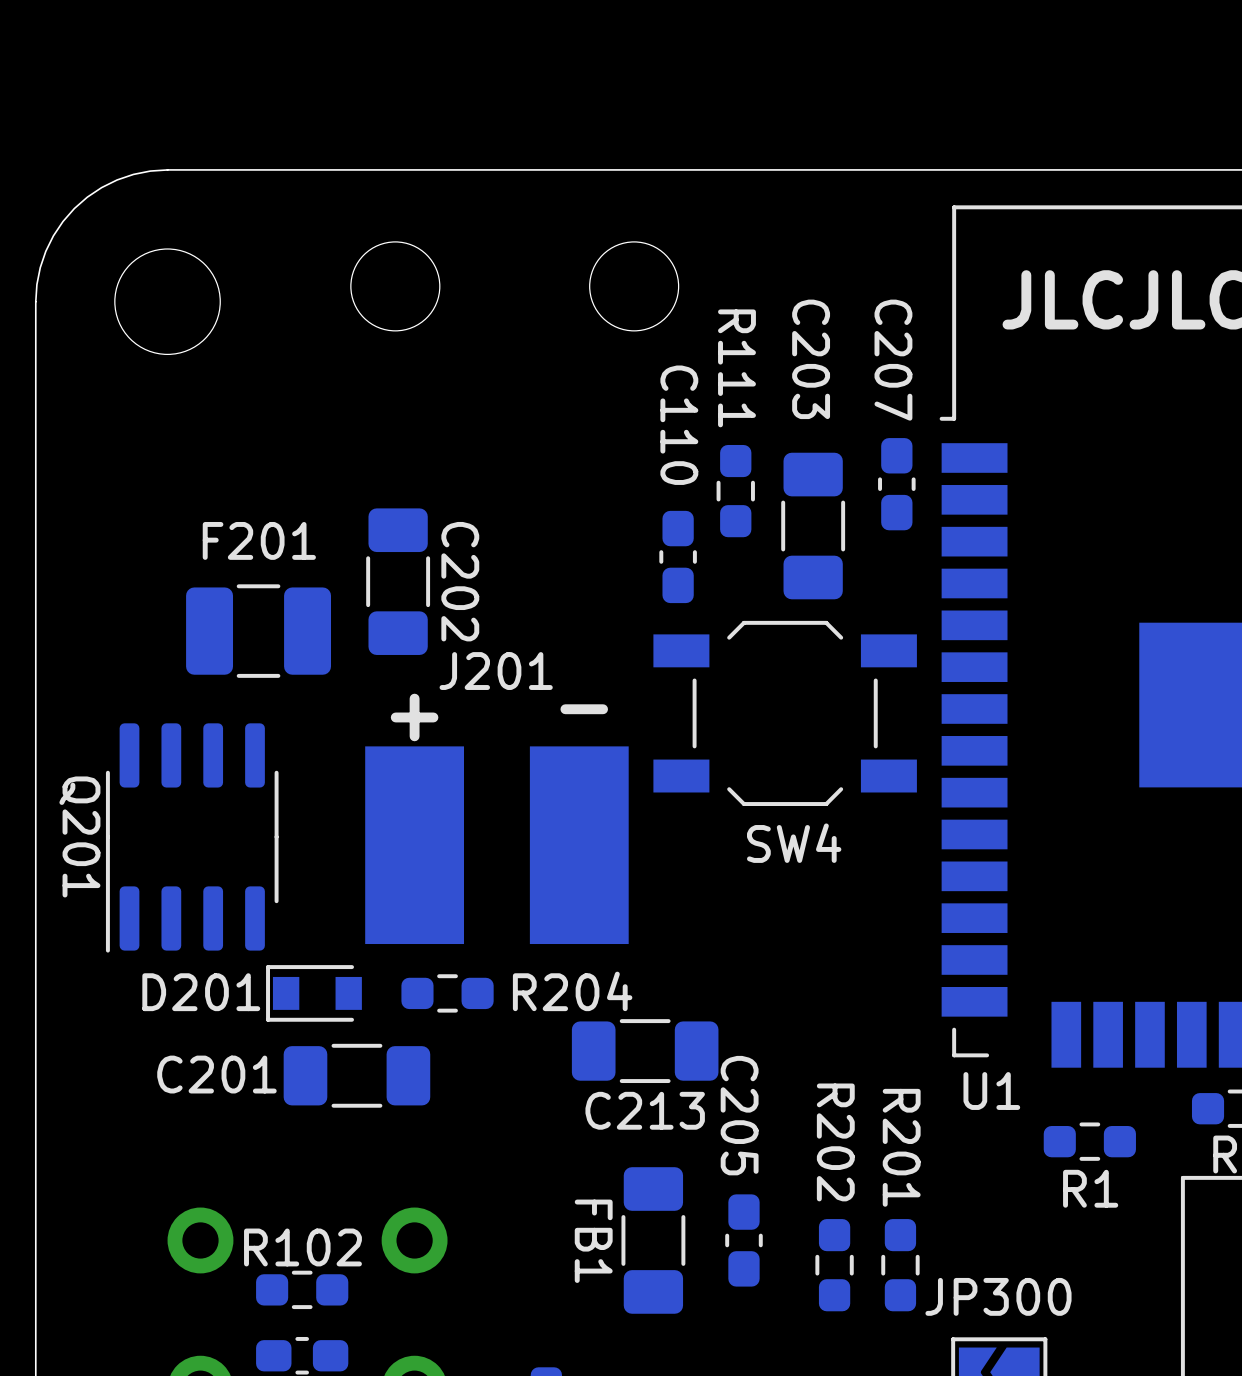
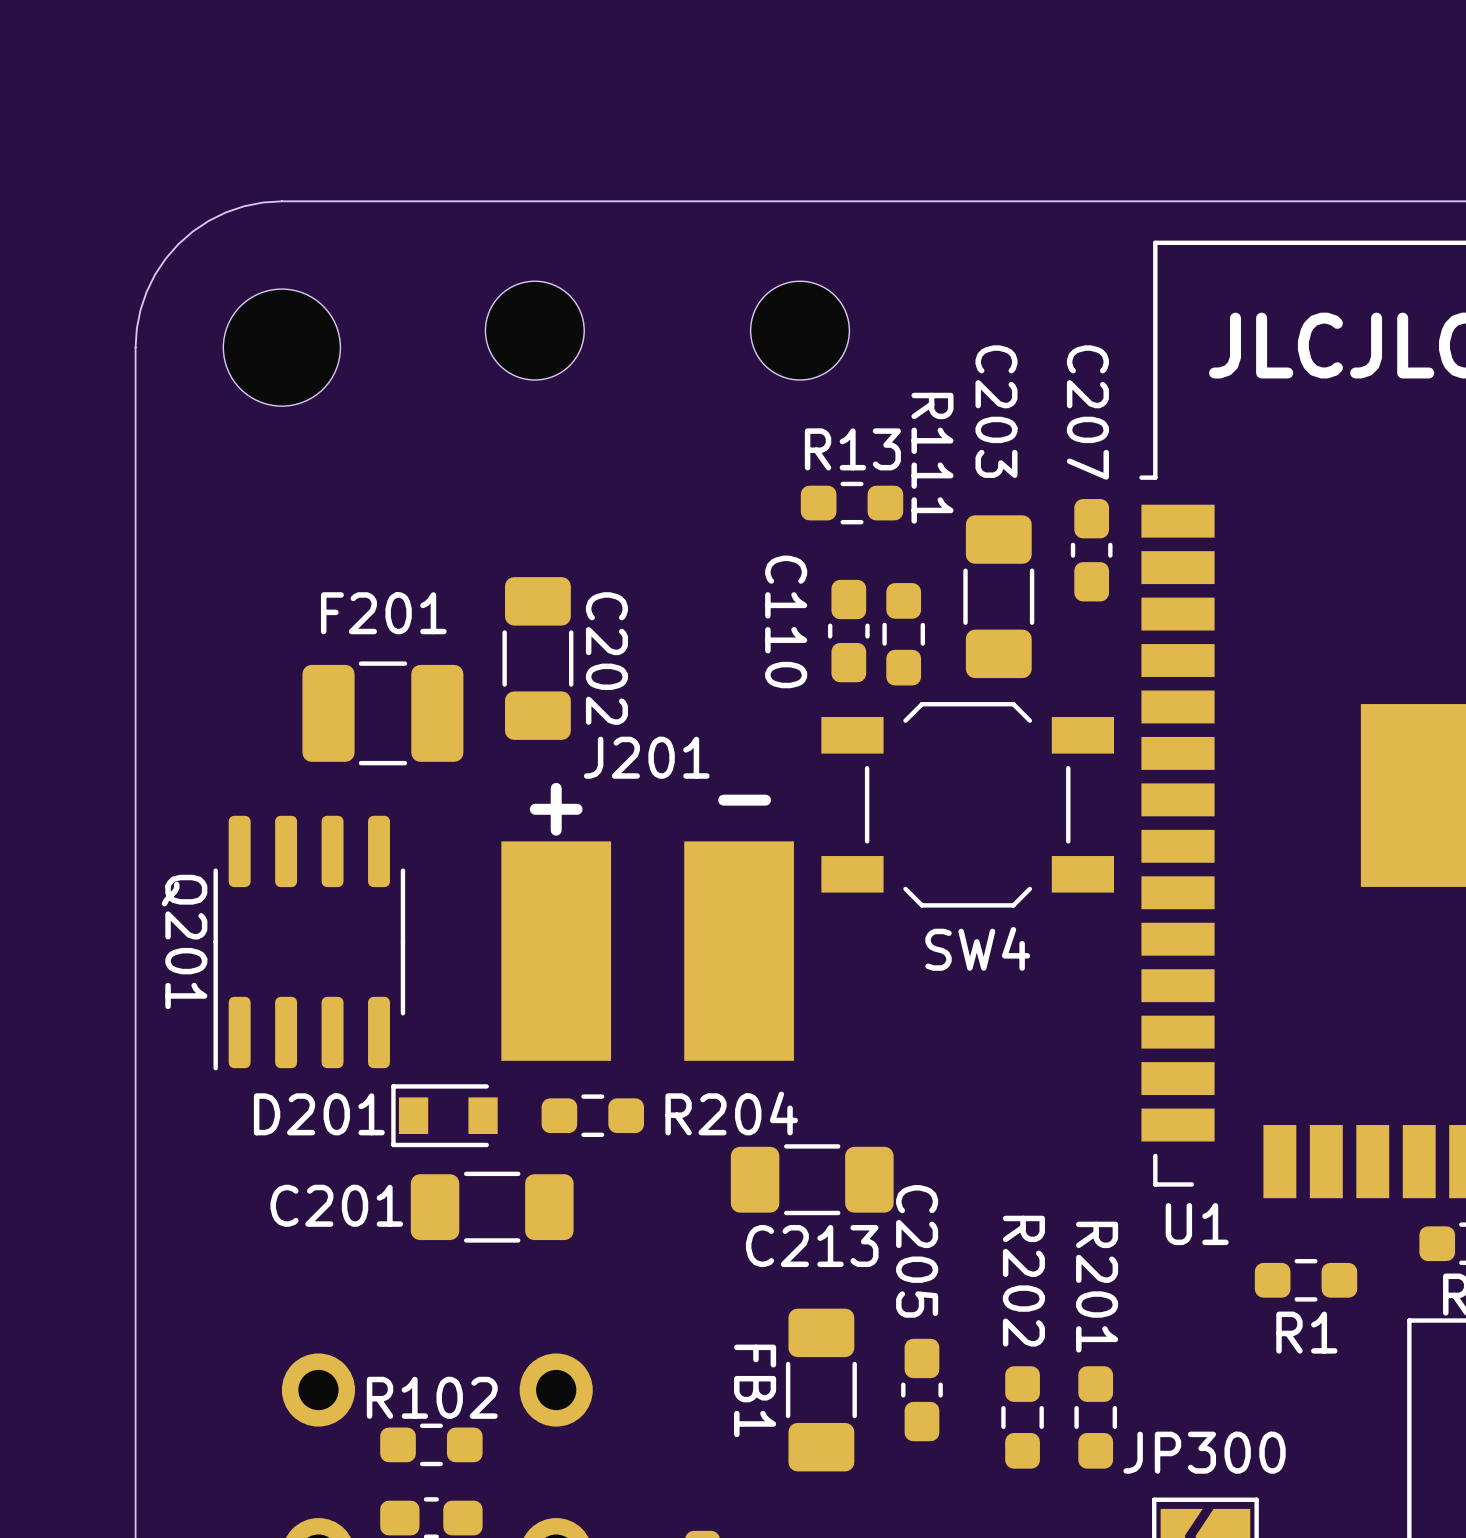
R111 name position: R111 (736, 368) -> R111 (932, 458)
C110 name position: C110 (679, 425) -> C110 (786, 621)
R13: none -> (852, 503)
R111 position: (735, 491) -> (903, 634)

